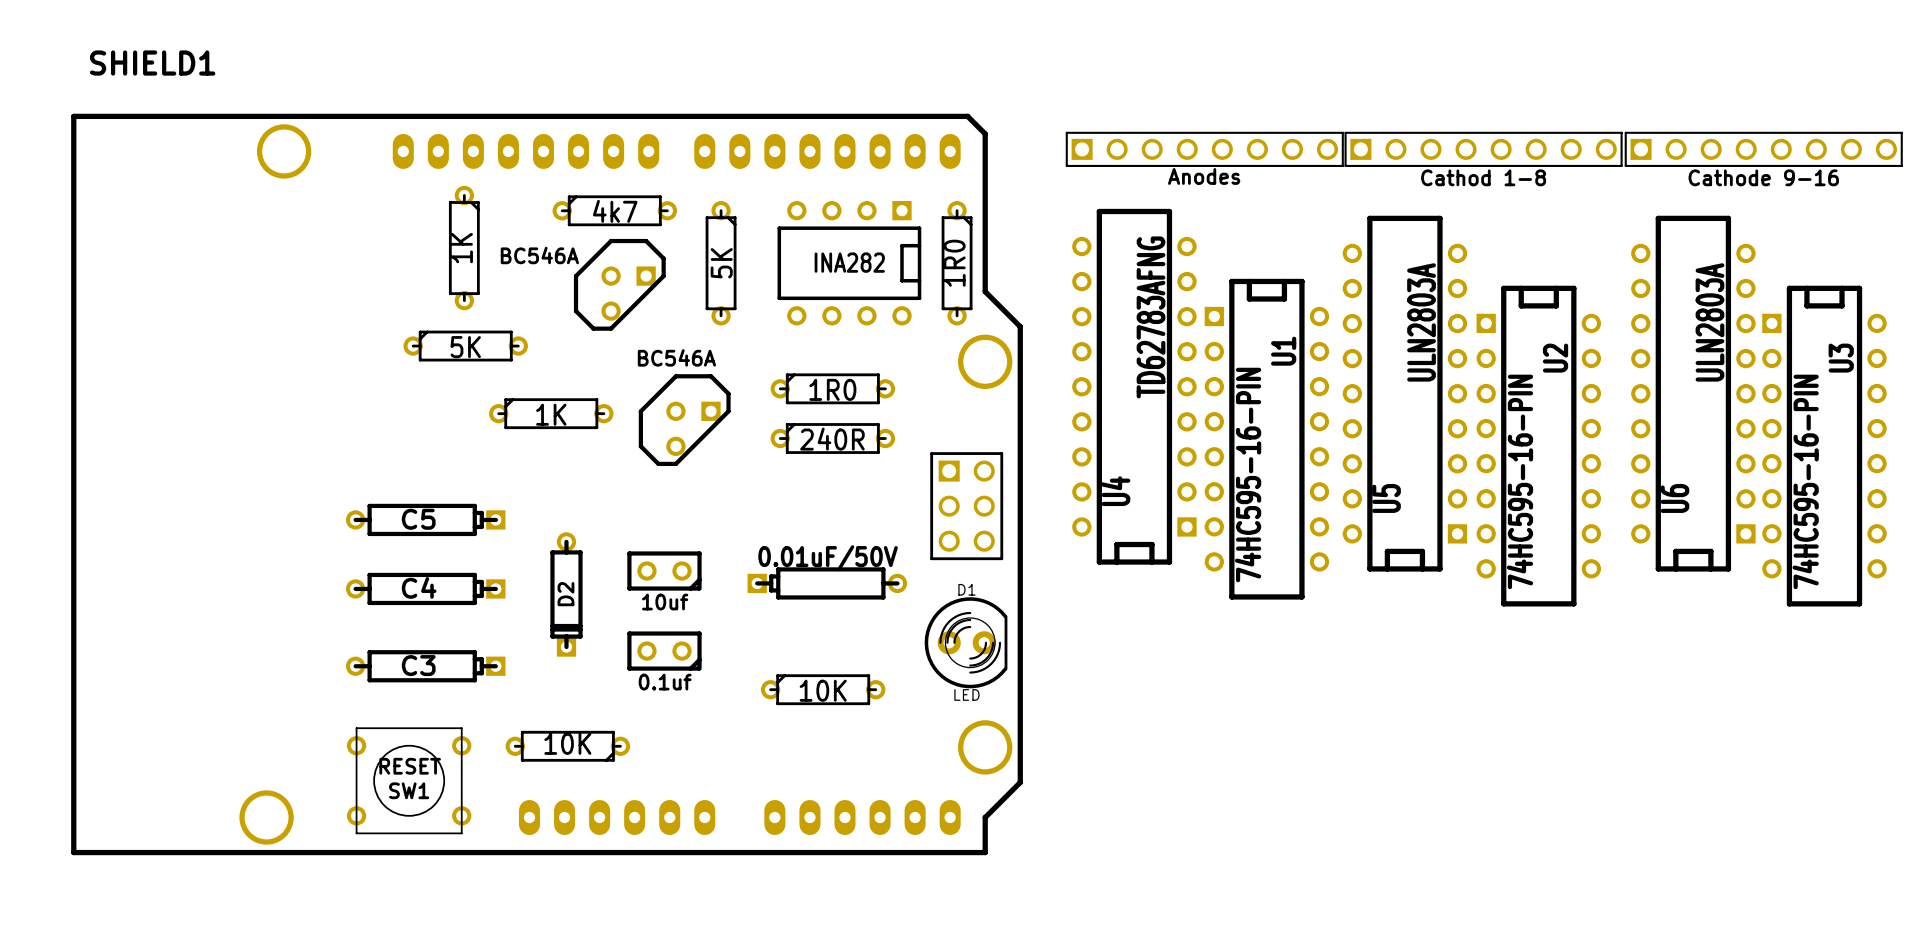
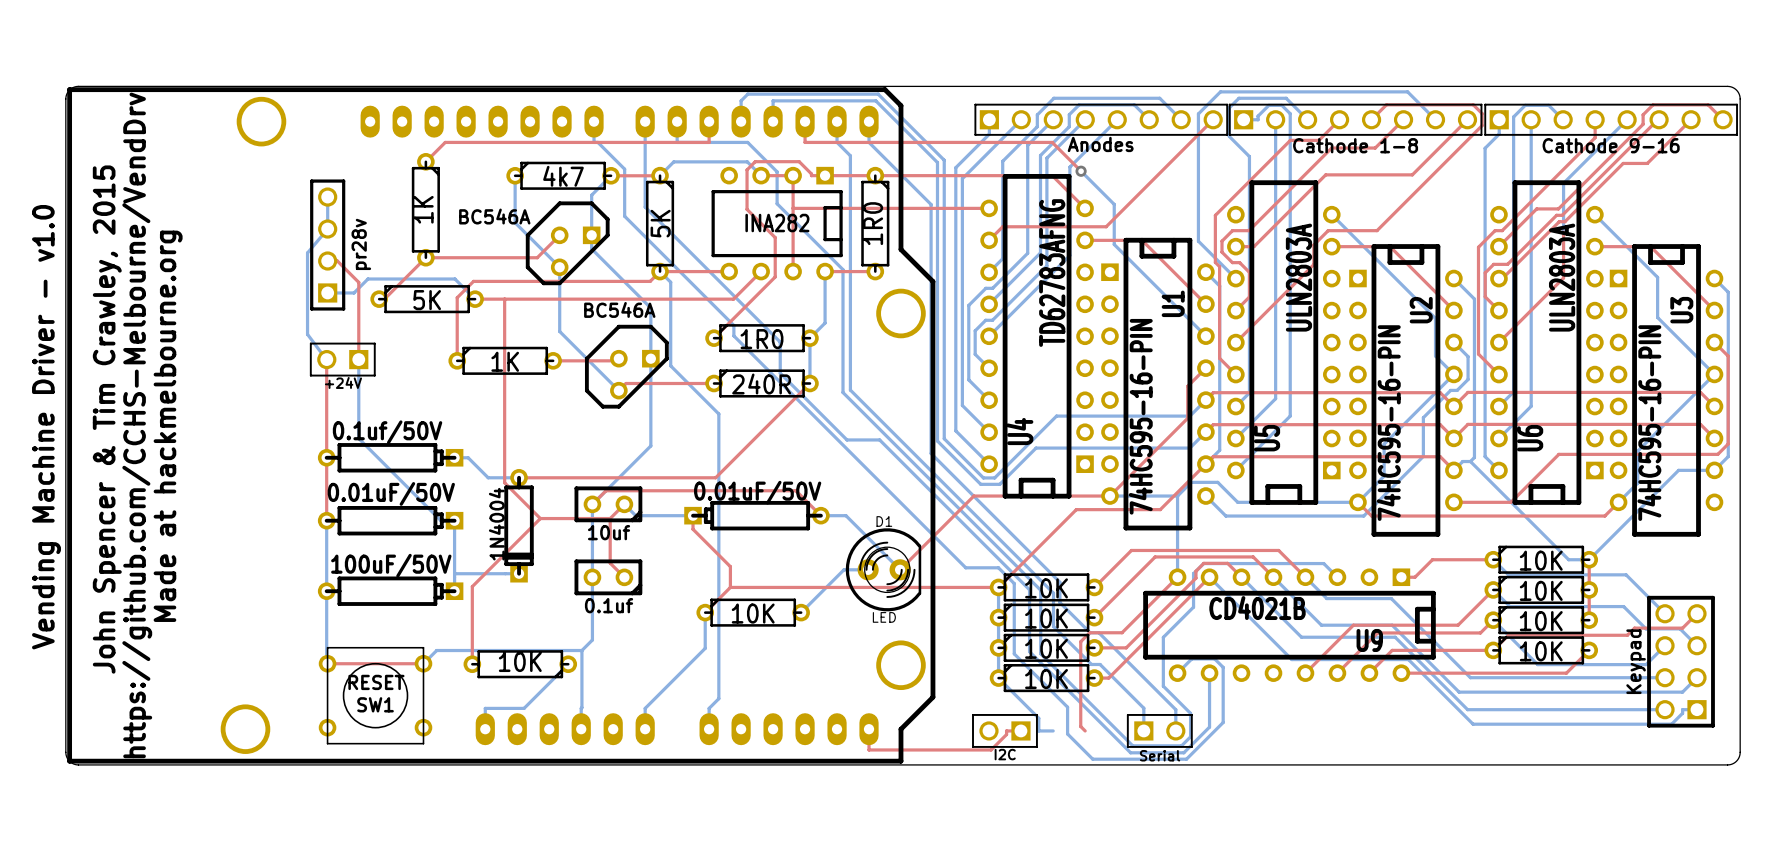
SHIELD1 name: SHIELD1 (152, 63) -> none
board edge: none -> (78, 86) (1732, 87) (1737, 91) (1740, 98) (1739, 757) (1735, 762) (1727, 764) (73, 763) (68, 760) (65, 752) (65, 98) (69, 90) (78, 86)
bottom track: none -> (989, 119) (989, 134) (955, 167) (955, 430) (989, 464)
bottom track: none -> (1021, 119) (962, 178) (962, 405) (989, 432)
bottom track: none -> (1053, 119) (1027, 145) (1027, 253) (992, 288) (985, 288) (968, 305) (968, 379) (989, 400)
bottom track: none -> (1085, 119) (1046, 158) (1046, 265) (992, 320) (985, 320) (975, 330) (975, 354) (989, 368)
bottom track: none -> (1117, 119) (1069, 167) (1069, 255) (989, 336)
bottom track: none -> (1149, 119) (1134, 104) (1079, 104) (1069, 114) (1069, 126) (1040, 155) (1040, 252) (989, 304)
bottom track: none -> (1181, 119) (1159, 98) (1053, 98) (1037, 114) (1037, 126) (1002, 161) (1002, 258) (989, 272)
top track: none -> (1213, 119) (1106, 226) (1002, 226) (989, 240)
bottom track: none -> (1243, 119) (1258, 119) (1258, 116) (1268, 105) (1281, 105) (1290, 113) (1290, 416) (1235, 470)
bottom track: none -> (1275, 119) (1275, 398) (1235, 438)
bottom track: none -> (1307, 119) (1286, 98) (1238, 98) (1229, 107) (1229, 136) (1249, 156) (1249, 392) (1235, 406)
top track: none -> (1339, 119) (1318, 140) (1290, 140) (1215, 215) (1215, 262) (1219, 266) (1219, 358) (1235, 374)
top track: none -> (1371, 119) (1386, 104) (1473, 104) (1482, 113) (1482, 125) (1377, 230) (1328, 230) (1313, 244) (1313, 264) (1235, 342)
top track: none -> (1403, 119) (1375, 148) (1331, 148) (1249, 230) (1232, 230) (1222, 241) (1222, 252) (1232, 262) (1239, 262) (1249, 272) (1249, 296) (1235, 310)
bottom track: none -> (1435, 119) (1407, 91) (1220, 91) (1198, 113) (1198, 241) (1235, 278)
top track: none -> (1467, 119) (1412, 174) (1325, 174) (1253, 246) (1235, 246)
bottom track: none -> (1499, 119) (1499, 134) (1485, 148) (1485, 456) (1498, 470)
bottom track: none -> (1531, 119) (1531, 406) (1498, 438)
bottom track: none -> (1563, 119) (1548, 105) (1525, 105) (1513, 116) (1513, 391) (1498, 406)
top track: none -> (1595, 119) (1595, 137) (1502, 230) (1495, 230) (1478, 247) (1478, 354) (1498, 374)
bottom track: none -> (1627, 119) (1563, 183) (1563, 232)
top track: none -> (1659, 119) (1562, 215) (1556, 215) (1507, 264) (1493, 264) (1485, 272) (1485, 296) (1498, 310)
top track: none -> (1691, 119) (1647, 163) (1623, 163) (1564, 221) (1559, 221) (1502, 278) (1498, 278)
top track: none -> (1723, 119) (1708, 104) (1653, 104) (1643, 114) (1643, 124) (1558, 208) (1536, 208) (1498, 246)
bottom track: none -> (594, 121) (594, 142) (597, 142) (624, 169) (624, 216) (733, 325) (733, 335) (965, 567) (998, 567) (1014, 583) (1014, 653) (1067, 707) (1067, 733) (1092, 759) (1186, 759) (1223, 722) (1223, 667) (1214, 658) (1191, 658) (1177, 673)
bottom track: none -> (645, 121) (645, 207) (780, 342) (780, 373) (846, 439) (879, 439) (1029, 589) (1029, 651) (1130, 752) (1183, 752) (1209, 727) (1209, 673)
bottom track: none -> (677, 121) (677, 142) (747, 142) (777, 171) (777, 203) (843, 269) (843, 392) (1040, 590) (1040, 653) (1132, 745) (1181, 745) (1190, 736) (1190, 713) (1163, 686) (1163, 637) (1193, 607) (1193, 573) (1203, 563) (1323, 563) (1337, 577)
top track: none -> (709, 121) (709, 142) (445, 142) (425, 161)
bottom track: none -> (741, 121) (741, 100) (747, 94) (878, 94) (944, 160) (944, 438) (983, 477) (994, 477) (1056, 416) (1189, 416) (1205, 400)
bottom track: none -> (773, 121) (773, 100) (875, 100) (937, 162) (937, 441) (980, 484) (999, 484) (1036, 448) (1189, 448) (1205, 432)
top track: none -> (805, 121) (805, 142) (1052, 142) (1081, 171)
bottom track: none -> (837, 121) (837, 142) (850, 155) (850, 390) (1053, 593) (1053, 626) (1091, 664) (1100, 664) (1143, 708) (1143, 730)
bottom track: none -> (869, 121) (869, 142) (931, 204) (931, 453) (1059, 582) (1059, 602) (1090, 632) (1098, 632) (1175, 709) (1175, 730)
part value: Cathod 1-8 (1483, 177) -> Cathode 1-8 (1355, 145)
bottom track: none -> (1081, 171) (1114, 204) (1114, 244) (1205, 336)
via: none -> (1081, 171)
bottom track: none -> (515, 175) (515, 222) (559, 267) (559, 331) (618, 390)
top track: none -> (611, 175) (659, 175)
bottom track: none -> (611, 175) (591, 195) (591, 248) (650, 308) (650, 445) (592, 504) (592, 640) (581, 650)
bottom track: none -> (660, 175) (673, 161) (747, 161) (761, 175)
top track: none -> (761, 175) (793, 175) (793, 271)
bottom track: none -> (327, 197) (327, 229) (307, 252) (307, 334) (326, 359)
top track: none -> (793, 208) (989, 208)
top track: none -> (1085, 208) (1052, 175) (811, 175) (799, 161) (755, 161) (747, 169) (747, 209) (775, 237) (775, 276) (714, 338)
bottom track: none -> (1331, 214) (1435, 318) (1435, 356) (1453, 374) (1384, 444) (1384, 476) (1357, 502) (1237, 502) (1217, 482) (1191, 482) (1177, 496)
bottom track: none -> (1594, 214) (1657, 277) (1657, 317) (1714, 374) (1637, 451) (1637, 483) (1618, 502)
top track: none -> (1563, 232) (1563, 277) (1498, 342)
top track: none -> (559, 235) (537, 257) (425, 257) (384, 299) (379, 299)
top track: none -> (1085, 240) (1142, 240) (1205, 304)
part: none -> pr28v (327, 245)
top track: none -> (1331, 246) (1390, 246) (1453, 310)
top track: none -> (1594, 246) (1650, 246) (1714, 310)
top track: none -> (327, 261) (337, 261) (358, 282) (358, 359)
bottom track: none -> (660, 271) (670, 282) (670, 365) (718, 414) (718, 698) (709, 708) (709, 729)
top track: none -> (729, 271) (660, 271) (650, 281) (473, 281) (457, 297) (457, 360)
top track: none -> (761, 271) (733, 299) (475, 299)
top track: none -> (825, 271) (875, 271)
bottom track: none -> (825, 271) (825, 323) (809, 338) (809, 383)
bottom track: none -> (1205, 272) (1219, 286) (1219, 450) (1205, 464)
bottom track: none -> (1453, 278) (1474, 299) (1474, 457) (1470, 461)
bottom track: none -> (1714, 278) (1728, 292) (1728, 456) (1714, 470) (1678, 470) (1589, 559) (1568, 559) (1470, 461)
bottom track: none -> (327, 292) (353, 292) (367, 279) (454, 279) (475, 299)
top track: none -> (504, 299) (504, 482) (540, 518)
bottom track: none -> (1453, 342) (1468, 356) (1468, 379) (1457, 390) (1450, 390) (1423, 417) (1423, 456) (1363, 516) (1225, 516) (1205, 496)
top track: none -> (1714, 342) (1728, 356) (1728, 444) (1717, 454) (1558, 454) (1510, 502) (1453, 502)
top track: none -> (618, 358) (616, 360) (553, 360)
top track: none -> (326, 359) (326, 520)
part: none -> +24V (342, 359)
bottom track: none -> (358, 359) (358, 438) (440, 520) (454, 520) (454, 591)
top track: none -> (1205, 368) (1187, 386) (1187, 418) (1109, 496) (973, 496) (900, 569)
top track: none -> (714, 383) (626, 383) (618, 390)
top track: none -> (809, 383) (715, 477) (519, 477)
top track: none -> (1205, 400) (1213, 392) (1440, 392) (1453, 406) (1467, 392) (1700, 392) (1714, 406)
text: none -> John Spencer & Tim Crawley, 2015 (107, 419)
text: none -> https://github.com/CCHS-Melbourne/VendDrv (137, 425)
text: none -> Made at hackmelbourne.org (168, 426)
text: none -> Vending Machine Driver - v1.0 (46, 427)
C5 value: none -> 0.1uf/50V (387, 432)
top track: none -> (1205, 432) (1213, 424) (1440, 424) (1453, 438) (1467, 424) (1700, 424) (1714, 438)
part: (966, 506) -> none
C5 name: C5 (418, 519) -> none
bottom track: none -> (454, 457) (468, 457) (488, 477) (519, 477)
bottom track: none -> (1470, 461) (1462, 461) (1453, 470)
top track: none -> (1453, 470) (1440, 456) (1213, 456) (1160, 509) (1076, 509) (998, 587) (730, 587)
C4 value: none -> 0.01uF/50V (391, 493)
bottom track: none -> (1109, 496) (1177, 496)
bottom track: none -> (1177, 496) (1177, 577)
top track: none -> (1357, 502) (1371, 516) (1604, 516) (1618, 502)
top track: none -> (592, 504) (606, 490) (796, 490) (820, 515)
top track: none -> (624, 504) (610, 518)
bottom track: none -> (624, 504) (635, 515) (693, 515)
top track: none -> (693, 515) (693, 529) (730, 566) (730, 587)
bottom track: none -> (820, 515) (845, 515) (900, 569)
top track: none -> (540, 518) (472, 586) (472, 664)
top track: none -> (540, 518) (610, 518)
top track: none -> (610, 518) (610, 563) (624, 577)
C4 name: C4 (419, 587) -> none
bottom track: none -> (326, 520) (327, 663)
D2 value: none -> 1N4004 (496, 524)
D2 name: D2 (565, 594) -> none
top track: none -> (1493, 559) (1432, 559) (1414, 577) (1401, 577)
bottom track: none -> (1493, 559) (1508, 574) (1626, 574) (1665, 613)
part: none -> 10K (1541, 559)
top track: none -> (1589, 559) (1589, 620)
C3 value: none -> 100uF/50V (391, 565)
bottom track: none -> (868, 569) (843, 569) (801, 612)
bottom track: none -> (454, 573) (519, 573)
top track: none -> (1177, 577) (1122, 632) (1089, 632) (1080, 641) (1080, 726) (1085, 730)
top track: none -> (1209, 577) (1108, 678) (1094, 678)
bottom track: none -> (1209, 577) (1291, 659) (1408, 659) (1473, 724) (1671, 724) (1682, 713) (1682, 709) (1696, 709)
top track: none -> (1241, 577) (1227, 563) (1203, 563) (1195, 571) (1195, 578) (1126, 647) (1094, 647)
bottom track: none -> (1241, 577) (1301, 637) (1395, 637) (1467, 709) (1665, 709)
top track: none -> (1273, 577) (1253, 556) (1155, 556) (1094, 617)
bottom track: none -> (1273, 577) (1321, 625) (1392, 625) (1459, 692) (1682, 692) (1696, 677)
top track: none -> (1305, 577) (1278, 550) (1131, 550) (1094, 587)
bottom track: none -> (1305, 577) (1326, 598) (1391, 598) (1470, 677) (1665, 677)
top track: none -> (730, 587) (705, 612)
bottom track: none -> (998, 587) (998, 678) (1038, 718) (1038, 730) (1053, 730)
part: none -> 10K (1046, 587)
top track: none -> (1493, 589) (1458, 625) (1353, 625) (1305, 673)
bottom track: none -> (1493, 589) (1509, 606) (1623, 606) (1645, 628) (1680, 628) (1696, 645)
part: none -> 10K (1541, 589)
C3 name: C3 (418, 665) -> none
bottom track: none -> (705, 612) (705, 648) (645, 708) (645, 729)
top track: none -> (1696, 613) (1682, 628) (1634, 628) (1627, 635) (1508, 635) (1493, 650) (1392, 650) (1369, 673)
part: none -> 10K (1046, 617)
top track: none -> (1493, 620) (1480, 632) (1377, 632) (1337, 673)
bottom track: none -> (1493, 620) (1537, 664) (1646, 664) (1665, 645)
part: none -> 10K (1541, 620)
U9: none -> CD4021B (1289, 625)
part: none -> 10K (1046, 647)
bottom track: none -> (581, 650) (436, 650) (423, 663)
bottom track: none -> (581, 650) (581, 729)
part: none -> 10K (1541, 650)
top track: none -> (1589, 650) (1566, 673) (1401, 673)
part: none -> Keypad (1681, 661)
top track: none -> (327, 663) (423, 663)
bottom track: none -> (568, 664) (524, 708) (485, 708) (485, 729)
part: none -> 10K (1046, 678)
top track: none -> (869, 729) (869, 749) (991, 749) (1006, 734) (1006, 730) (1020, 730)
part: none -> I2C (1004, 730)
part: none -> Serial (1159, 730)

